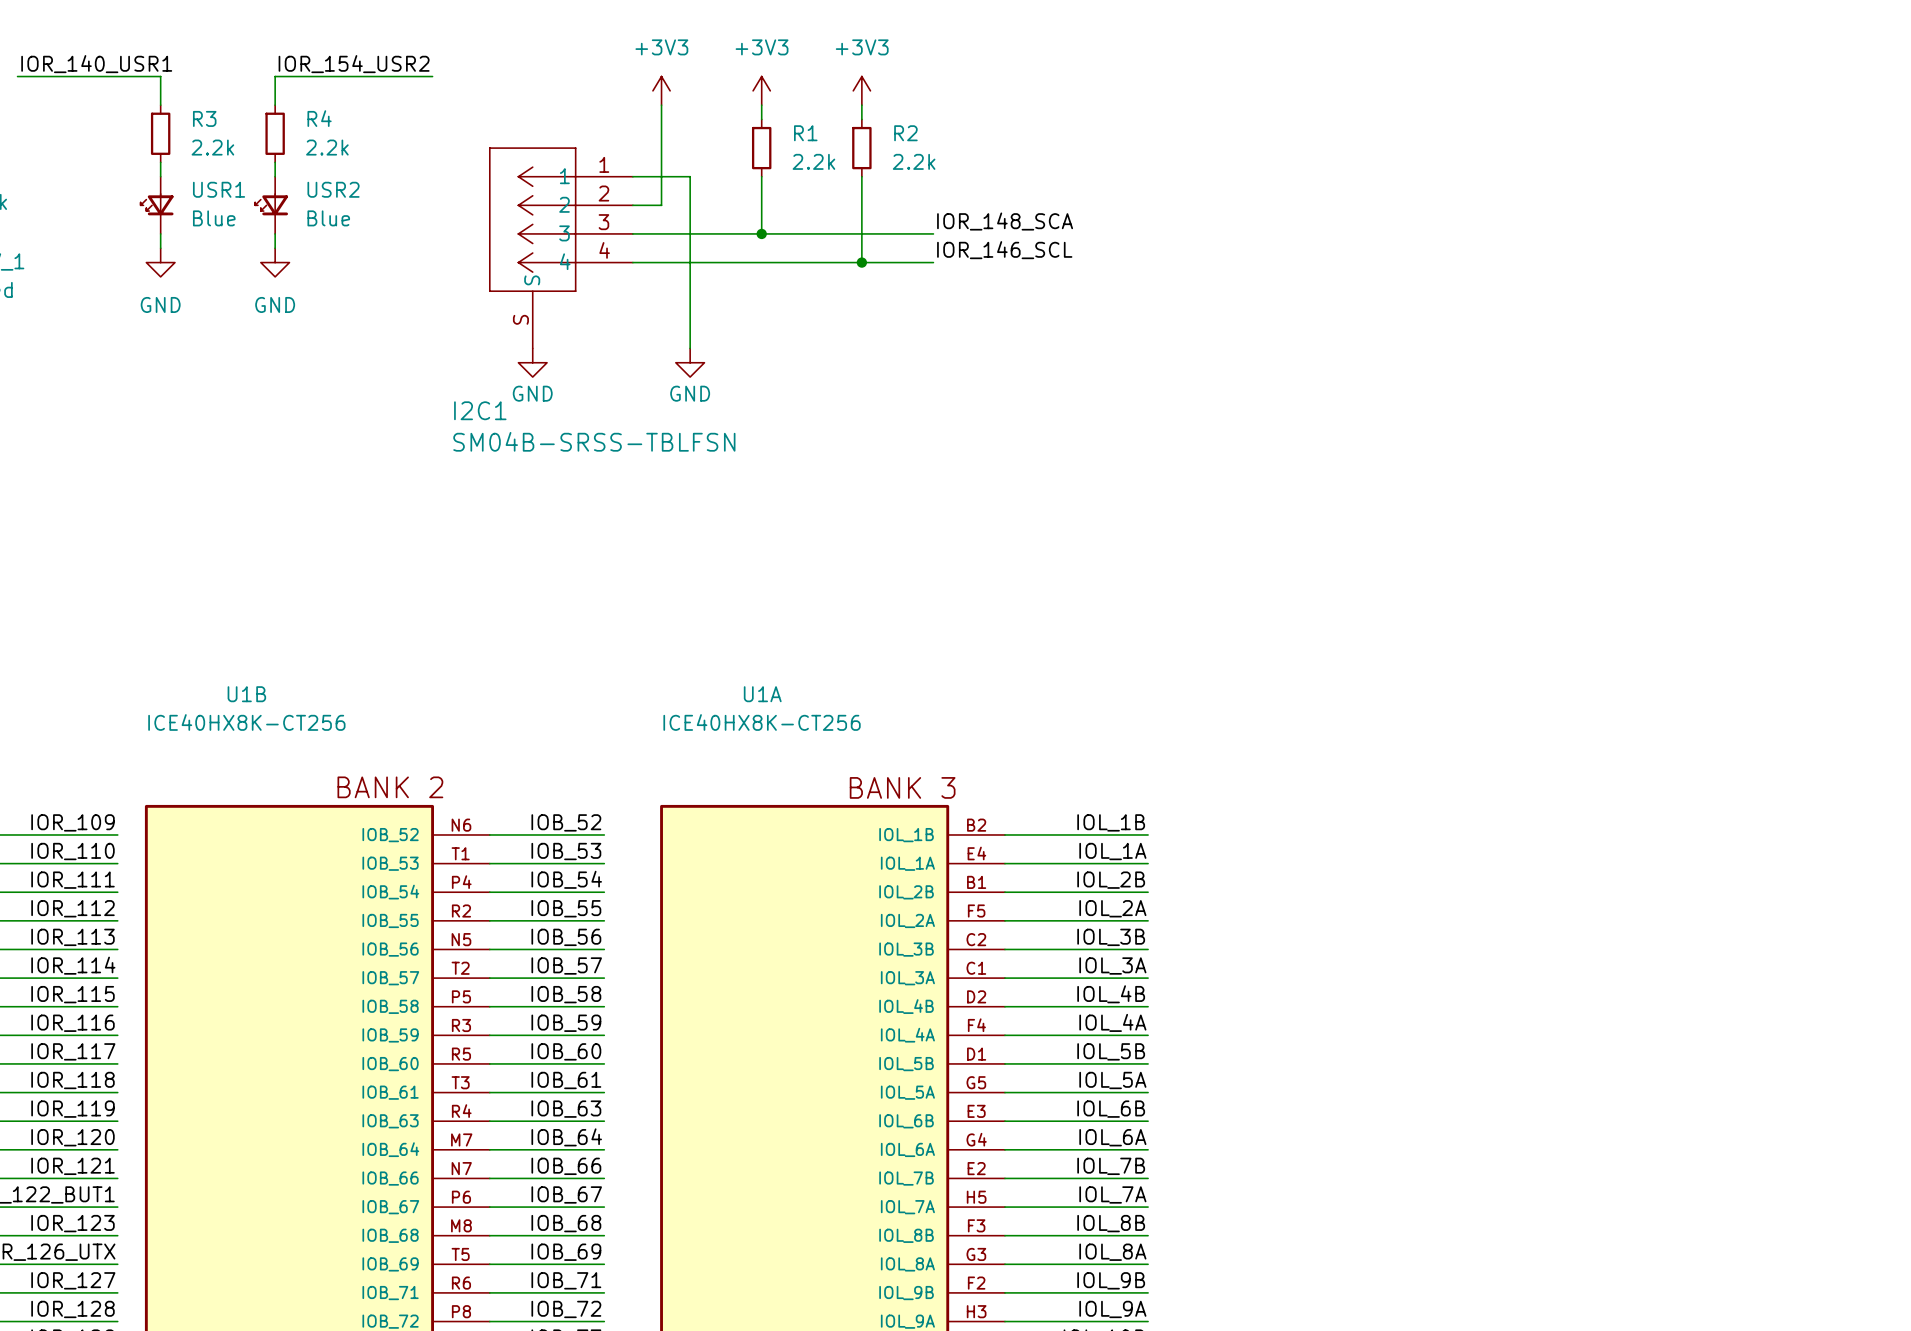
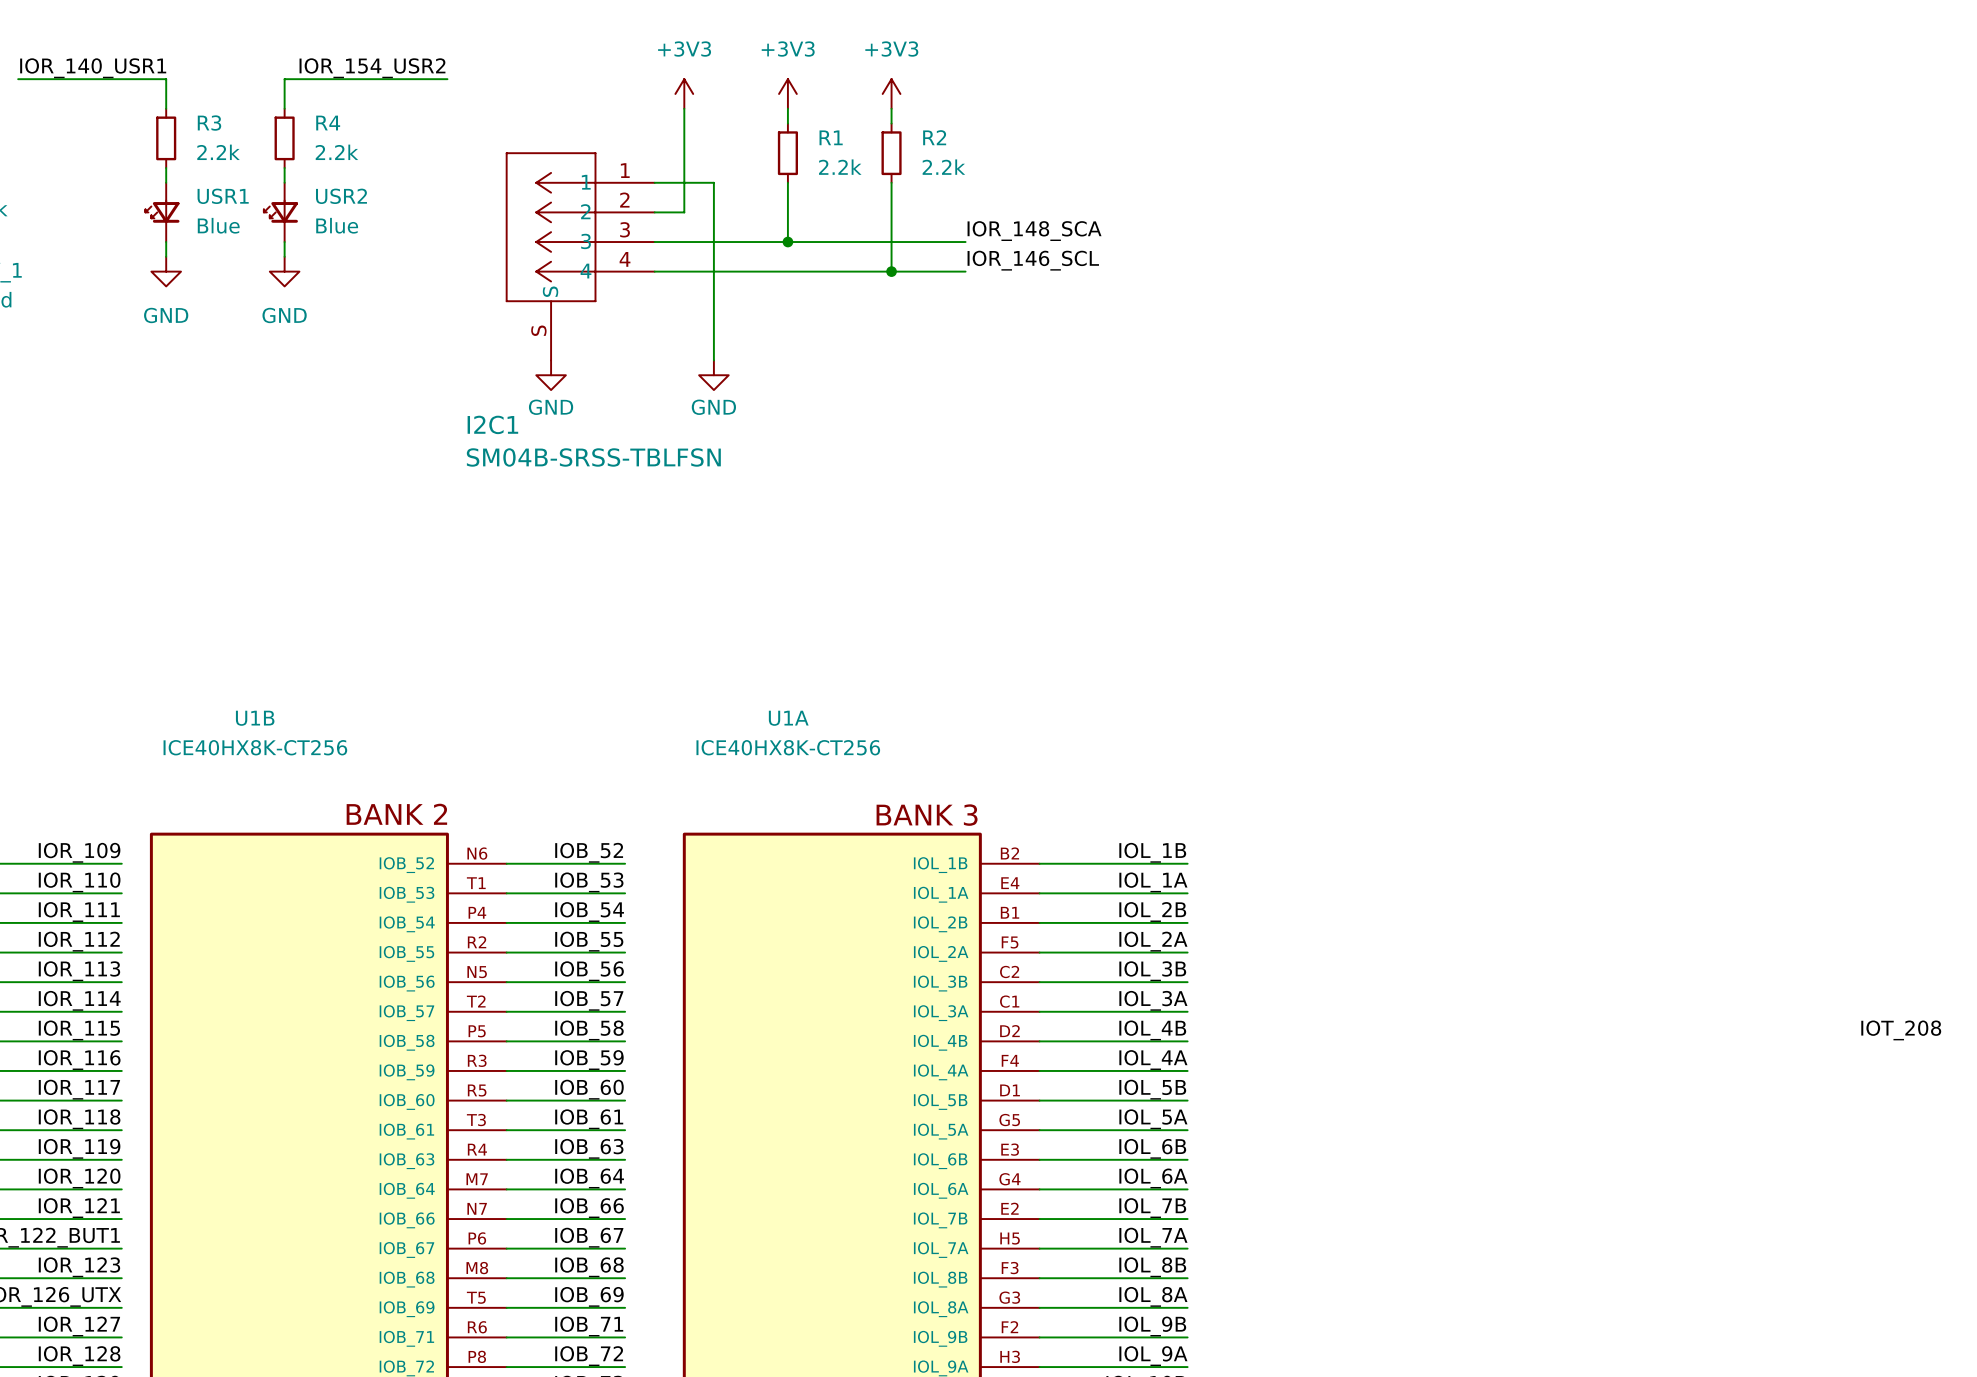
label: none -> IOT_208 (1901, 1030)

